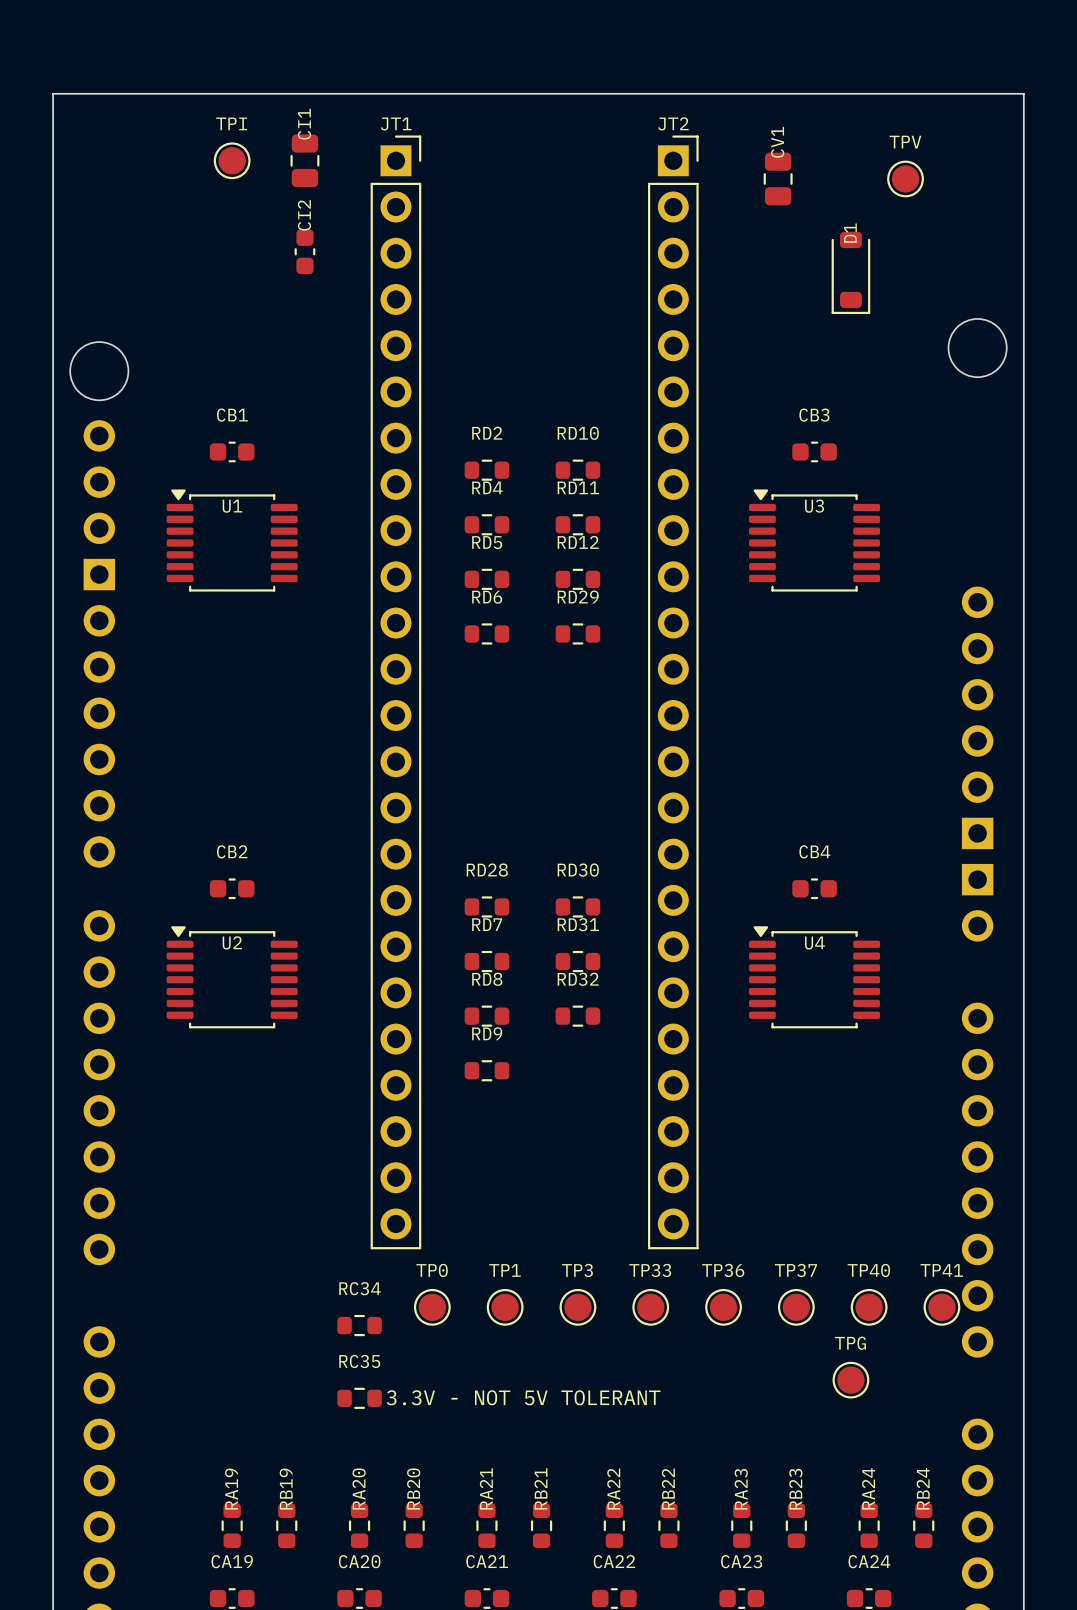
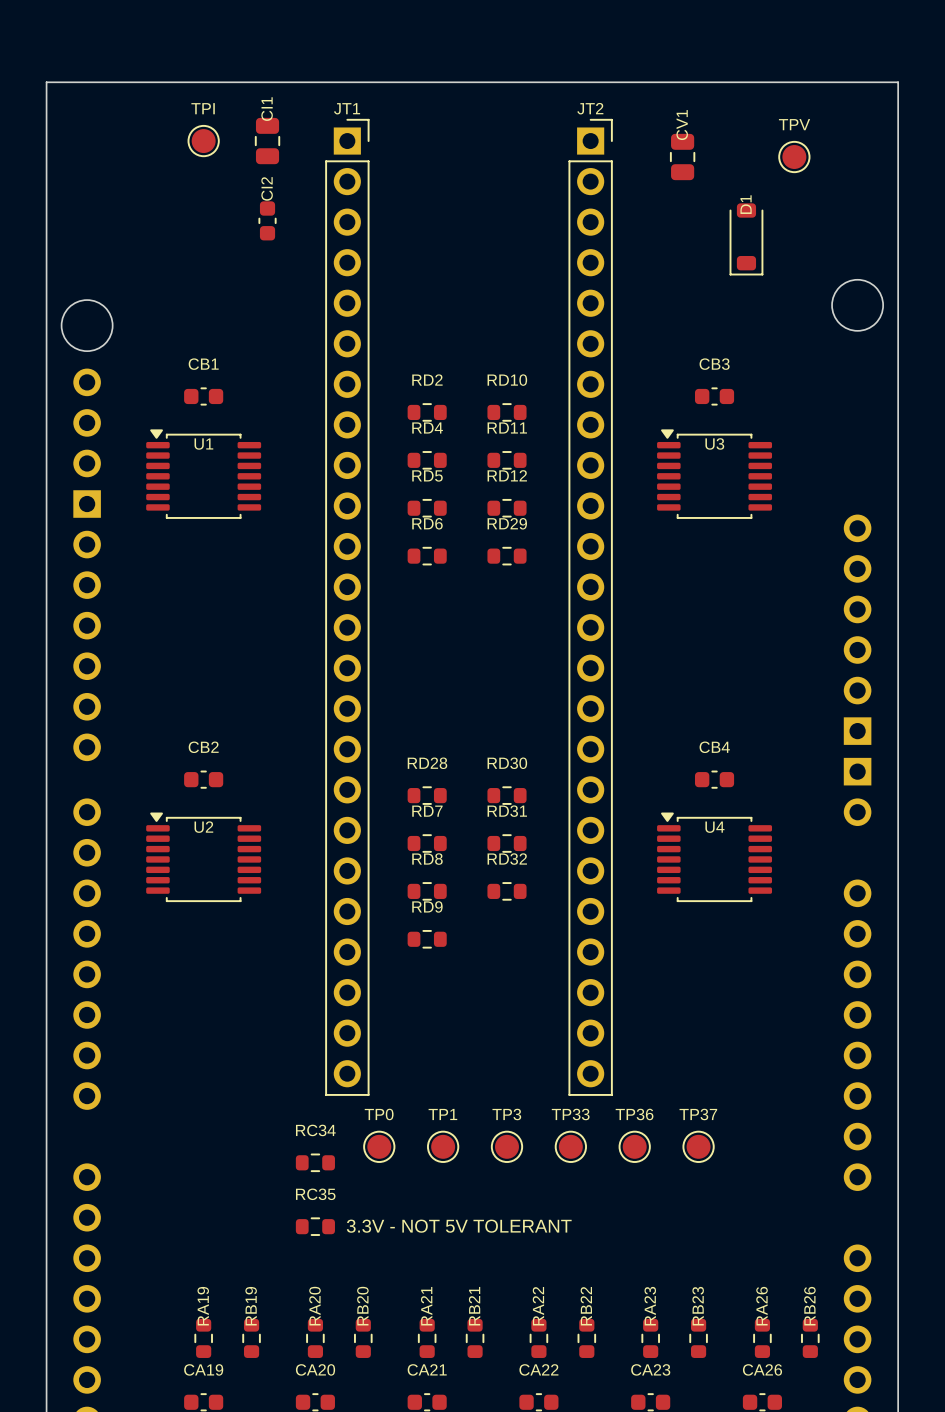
TP40: (869, 1307) -> none
TP41: (941, 1307) -> none
TPG: (850, 1380) -> none
RA24 name: RA24 (868, 1488) -> RA26 (762, 1306)
RB24 name: RB24 (923, 1488) -> RB26 (809, 1306)
CA24 name: CA24 (869, 1561) -> CA26 (762, 1369)

